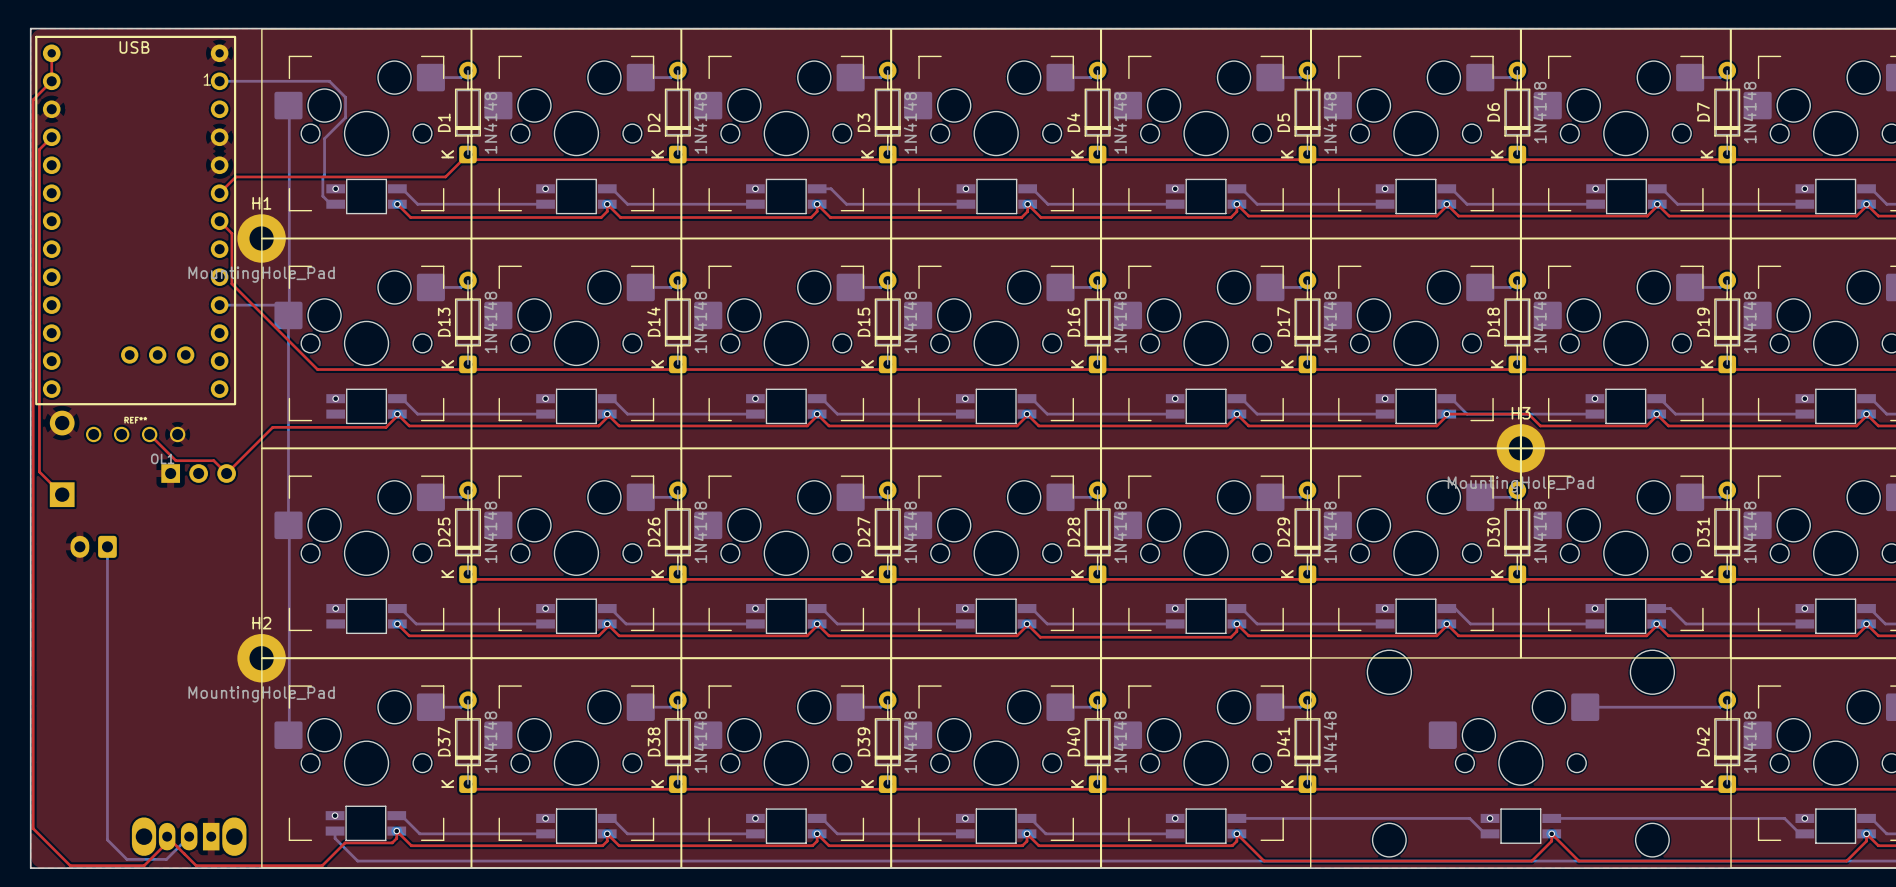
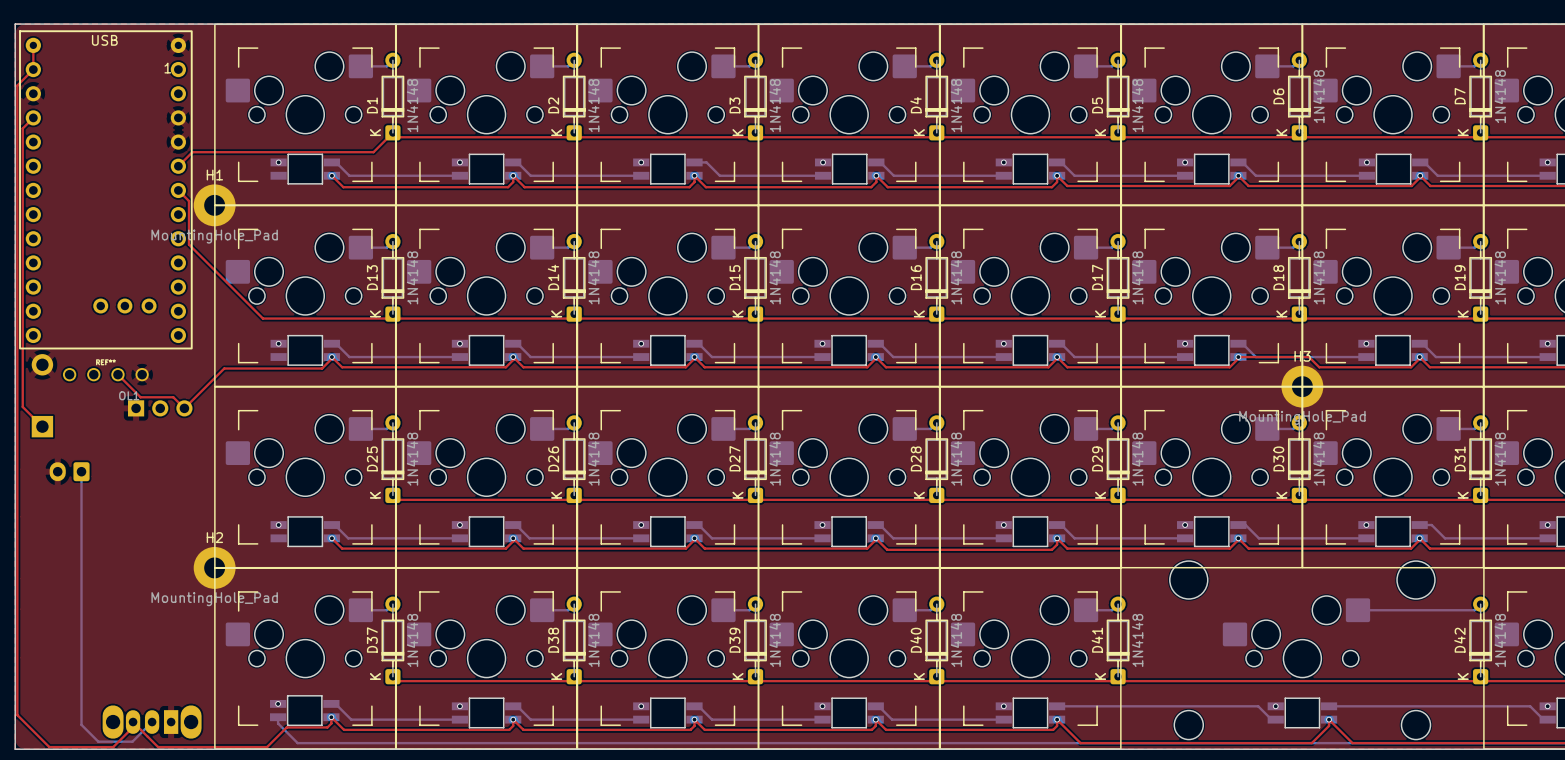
bottom track: (219, 81) (329, 81) (345, 97) (345, 117) (324, 138) (322, 196) (330, 204) -> none
bottom track: (289, 106) (289, 314) -> none
bottom track: (219, 305) (278, 305) -> none
bottom track: (288, 315) (288, 525) -> none
bottom track: (289, 526) (289, 734) -> none

